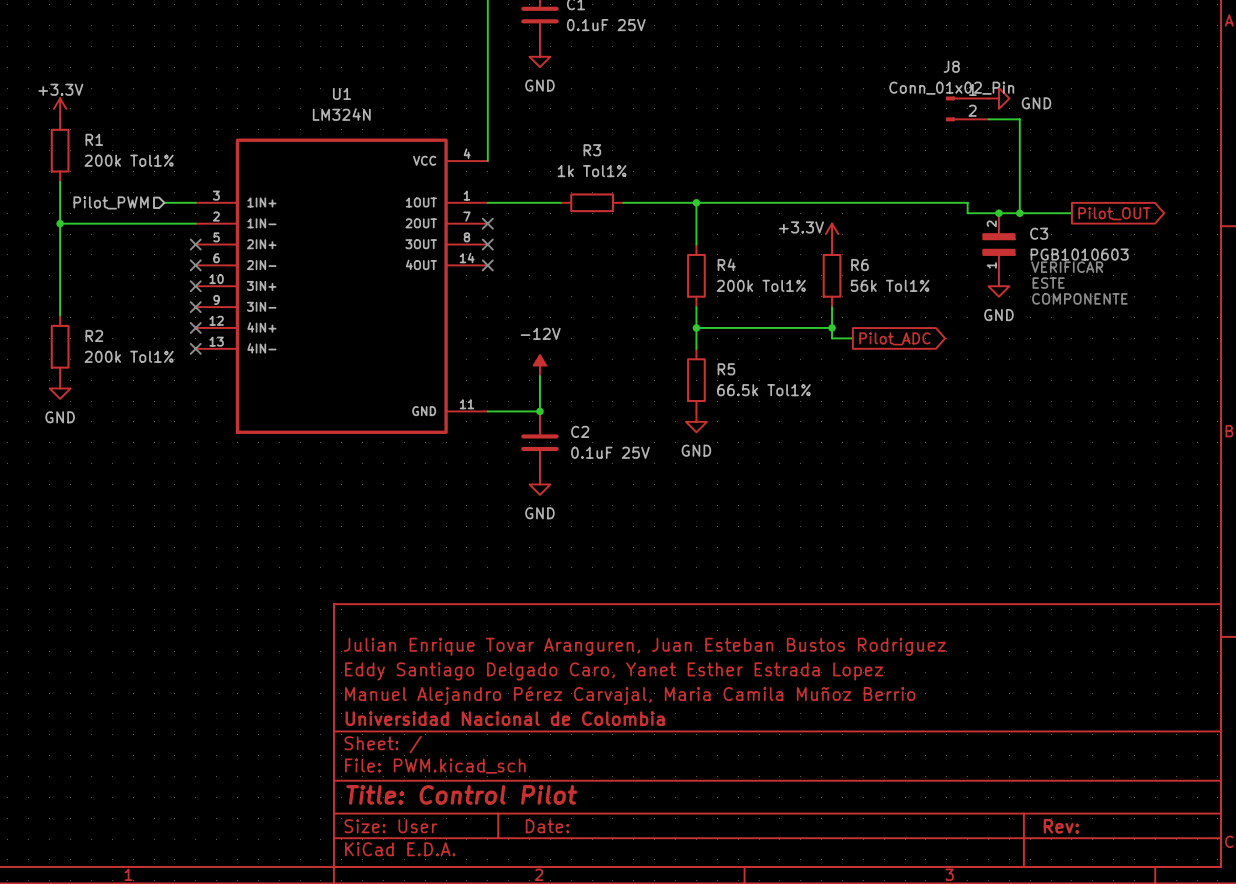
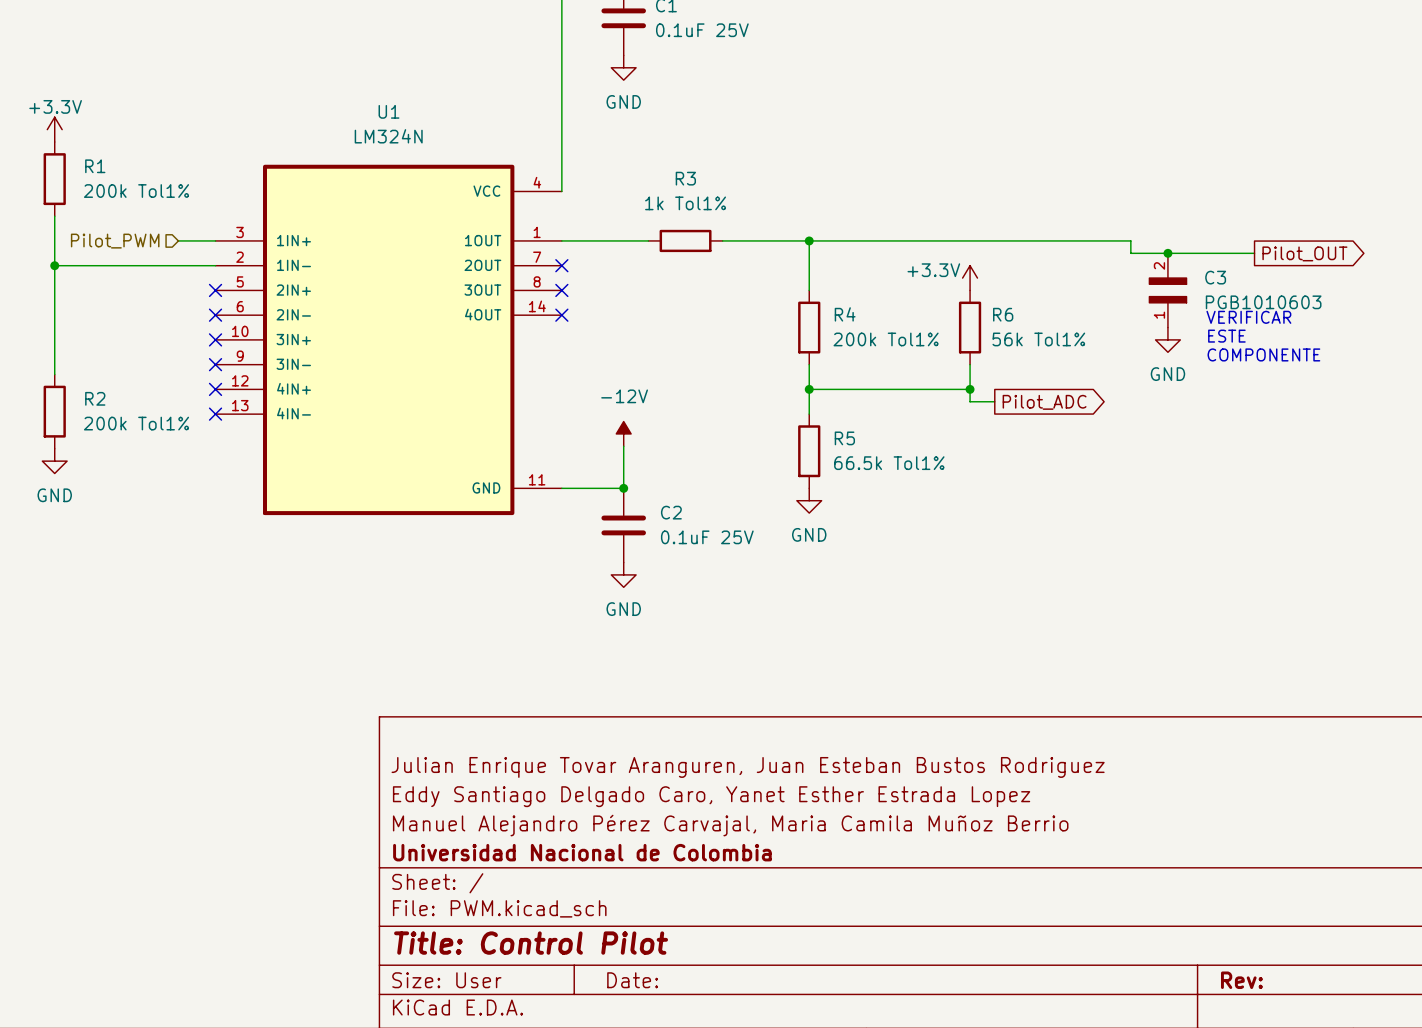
power symbol: GND (998, 98) -> none
J8: Conn_01x02_Pin (967, 108) -> none
wire: (988, 119) (1019, 119) (1019, 213) -> none
junction: (1019, 213) -> none

